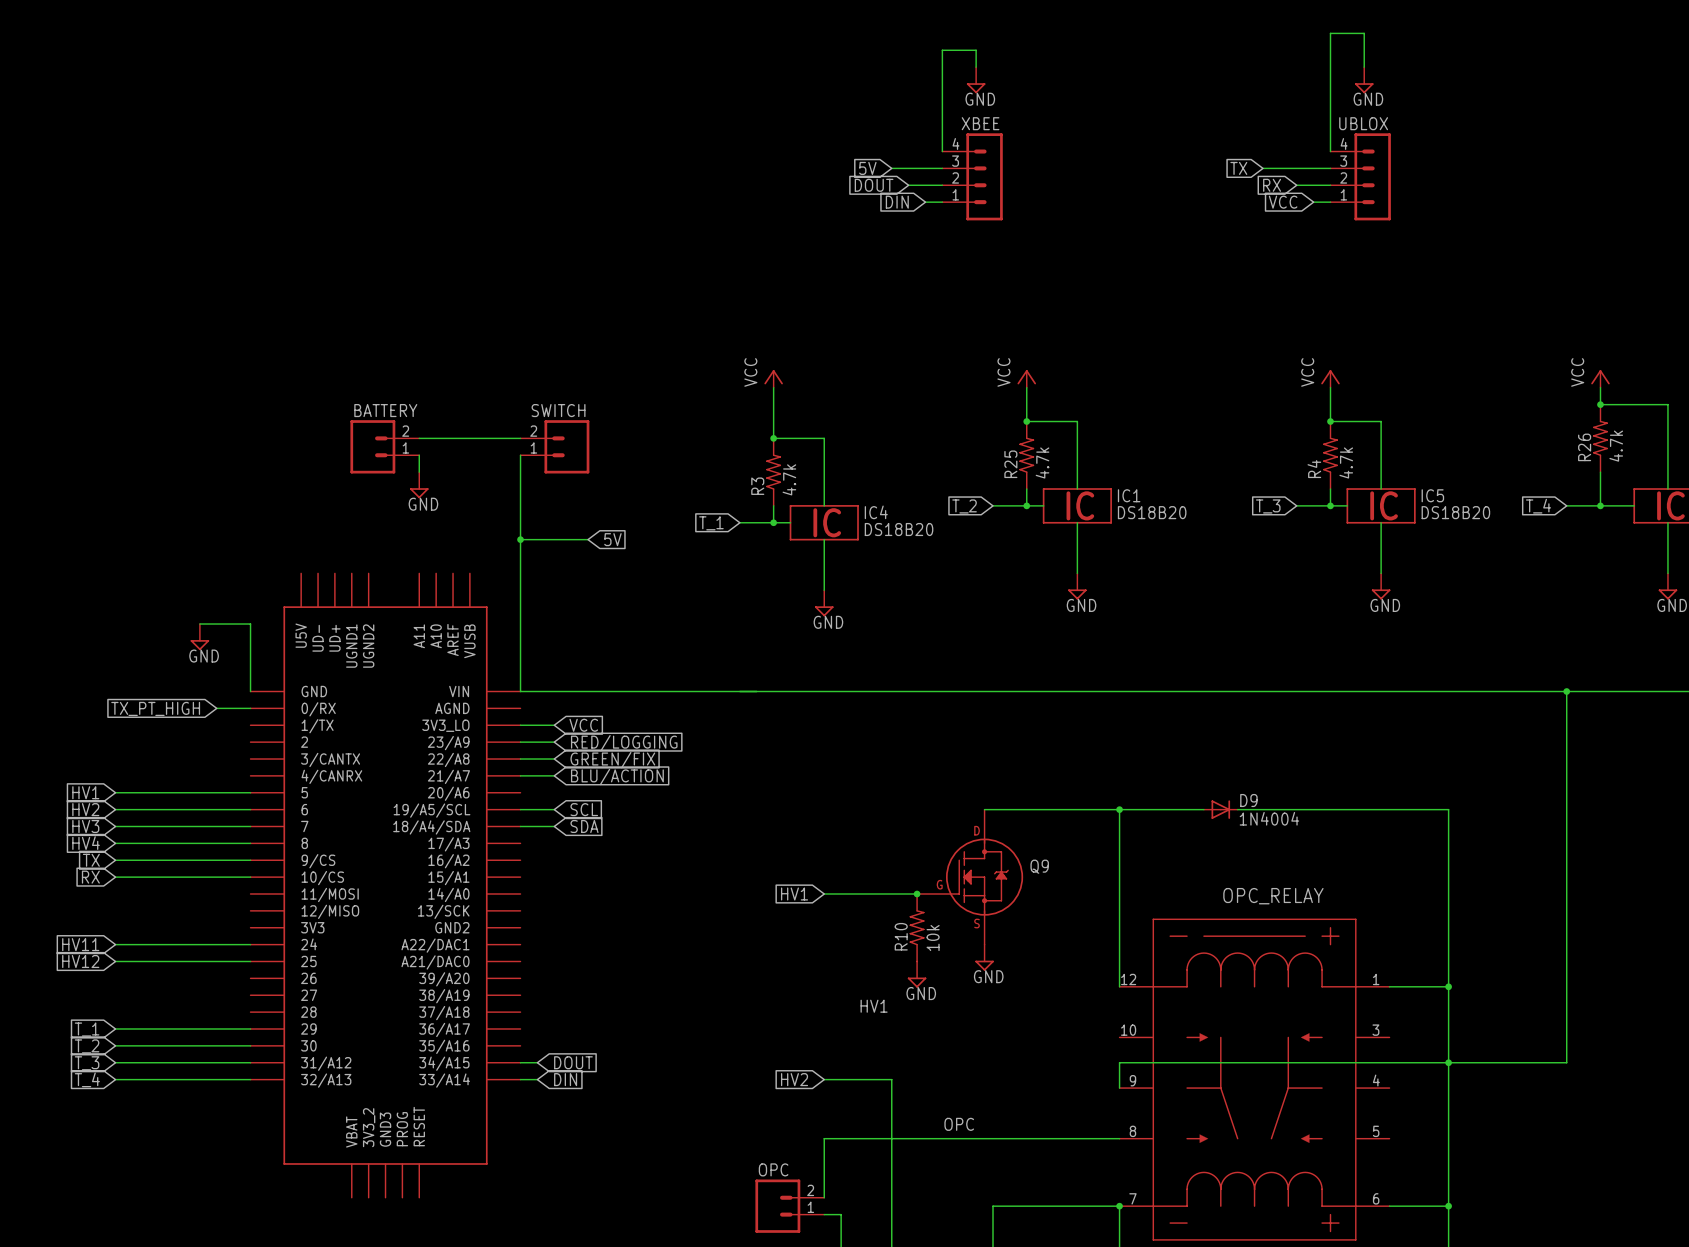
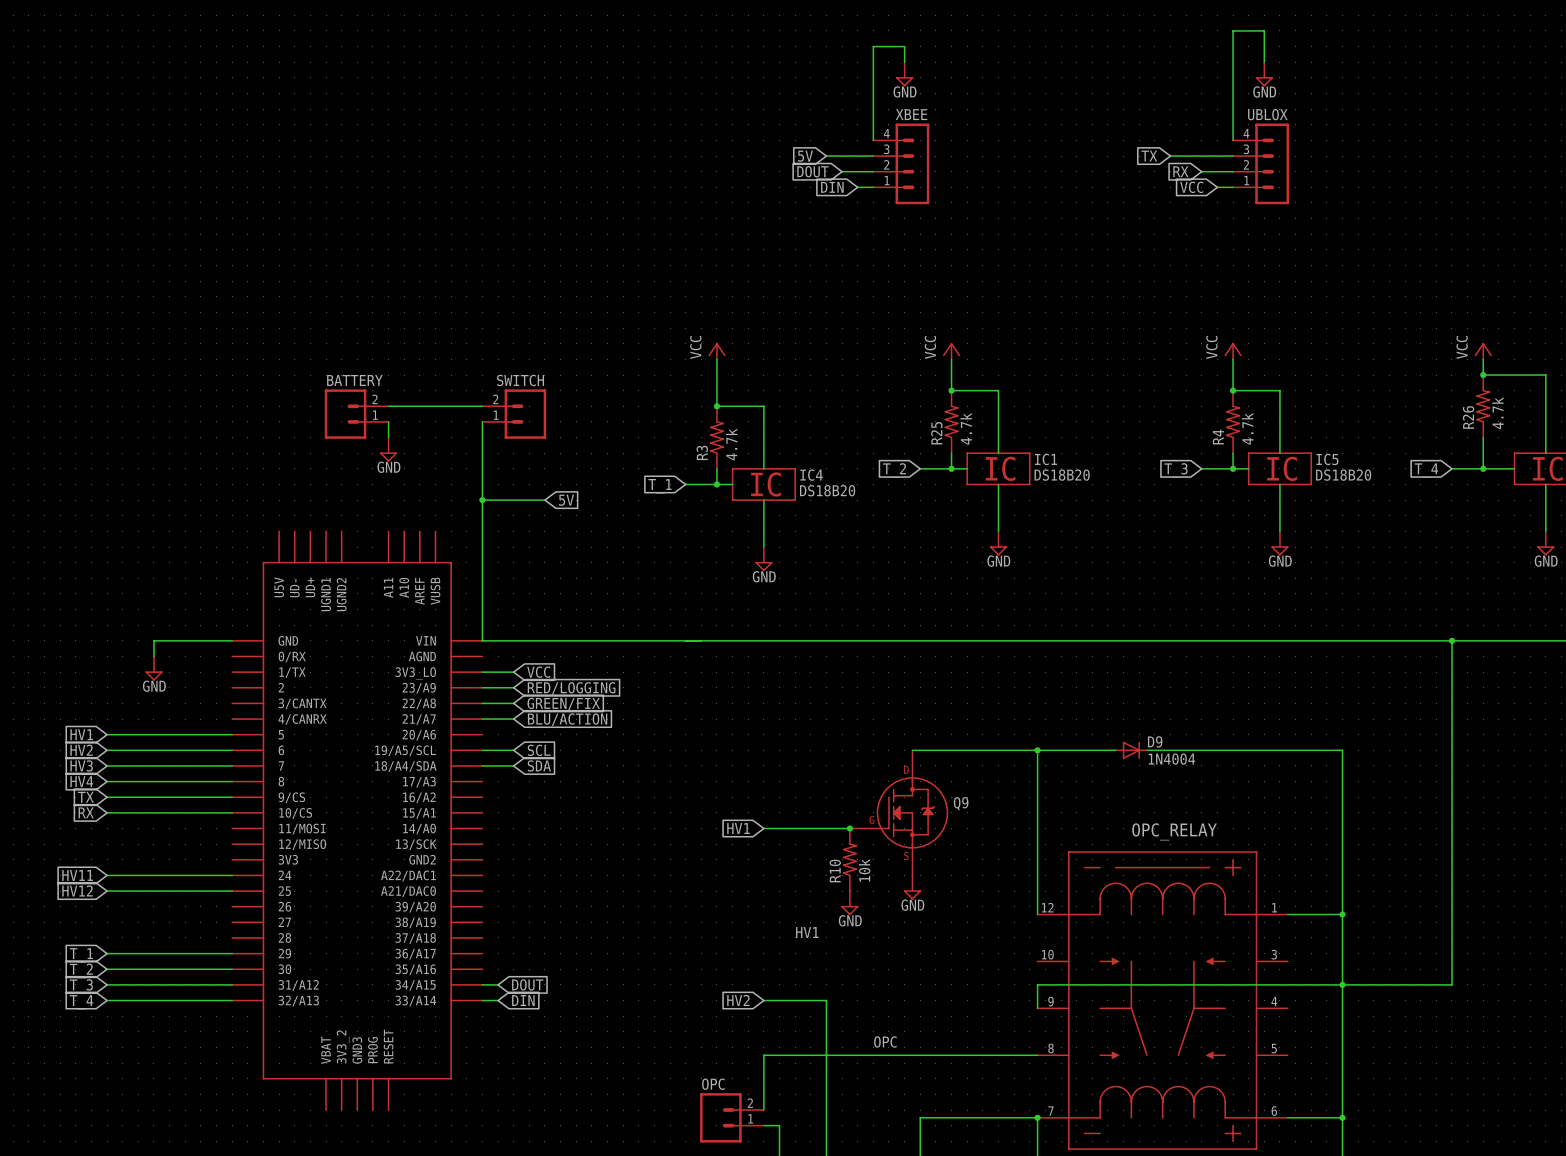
wire: (199, 624) (250, 624) (250, 691) -> (153, 656) (153, 640) (232, 640)
power symbol position: GND (199, 637) -> GND (153, 668)
global label: TX_PT_HIGH (155, 708) -> none
wire: (216, 708) (250, 708) -> none

